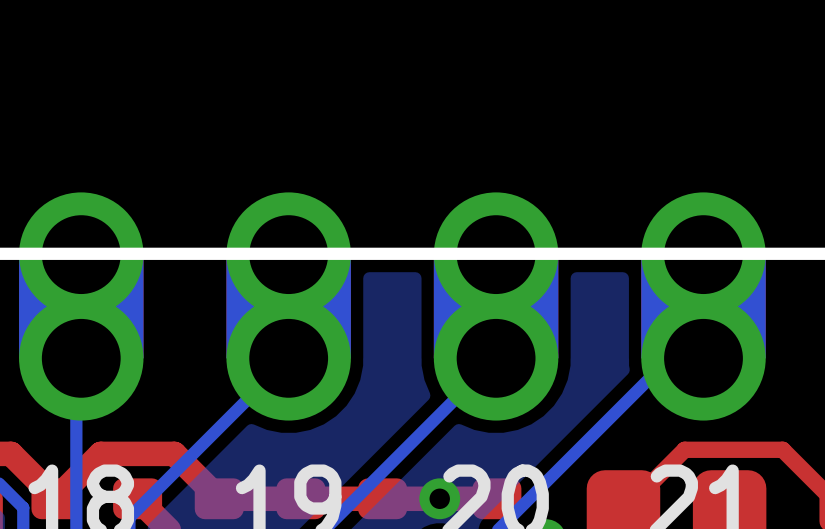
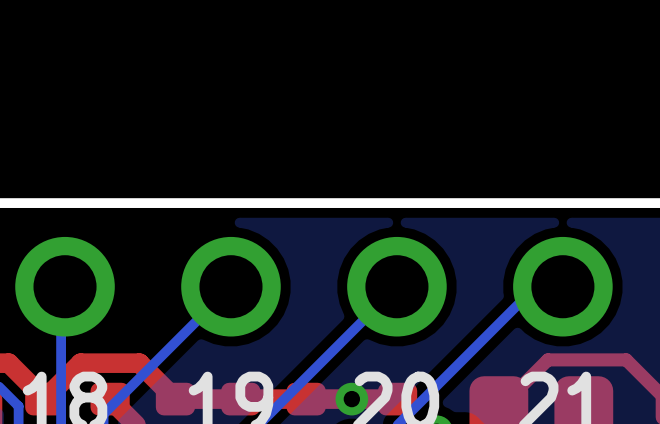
part footprint: [19, 192, 144, 421] -> [15, 236, 115, 337]
part footprint: [226, 192, 351, 421] -> [181, 236, 281, 337]
part footprint: [433, 192, 559, 421] -> [347, 236, 447, 337]
part footprint: [641, 192, 766, 421] -> [513, 236, 613, 337]

